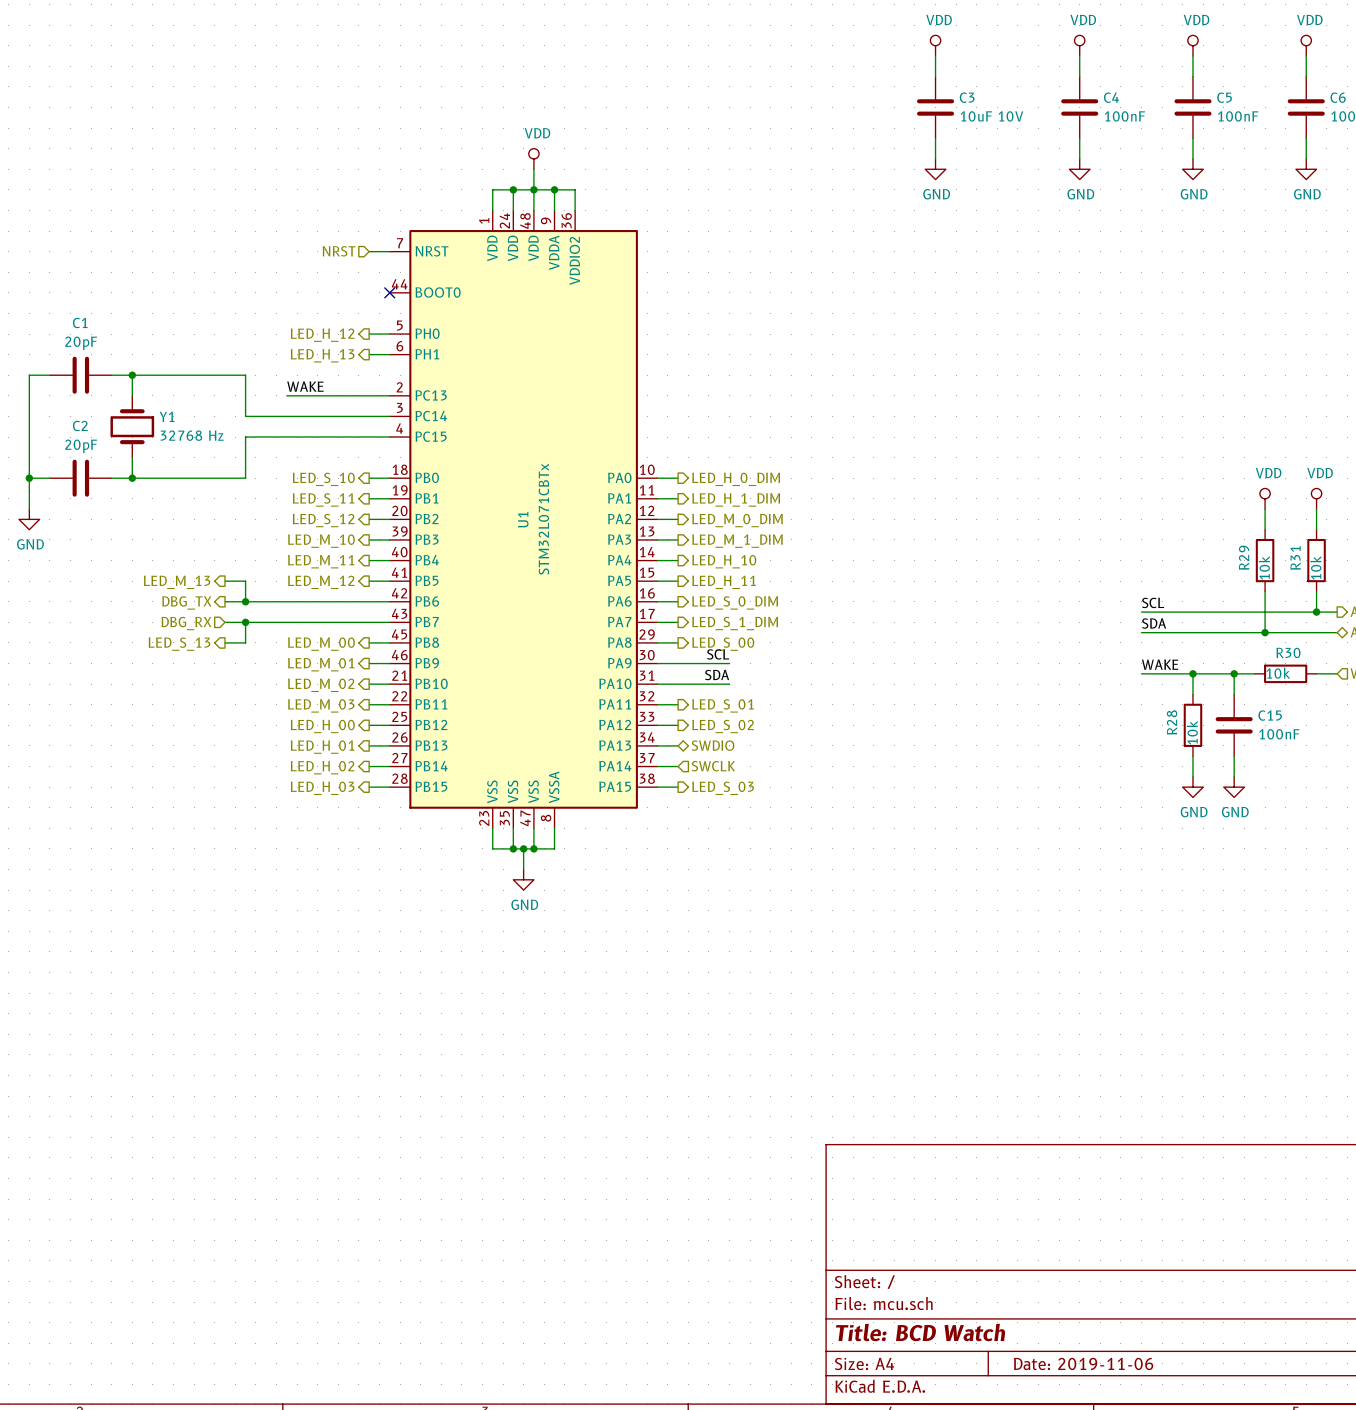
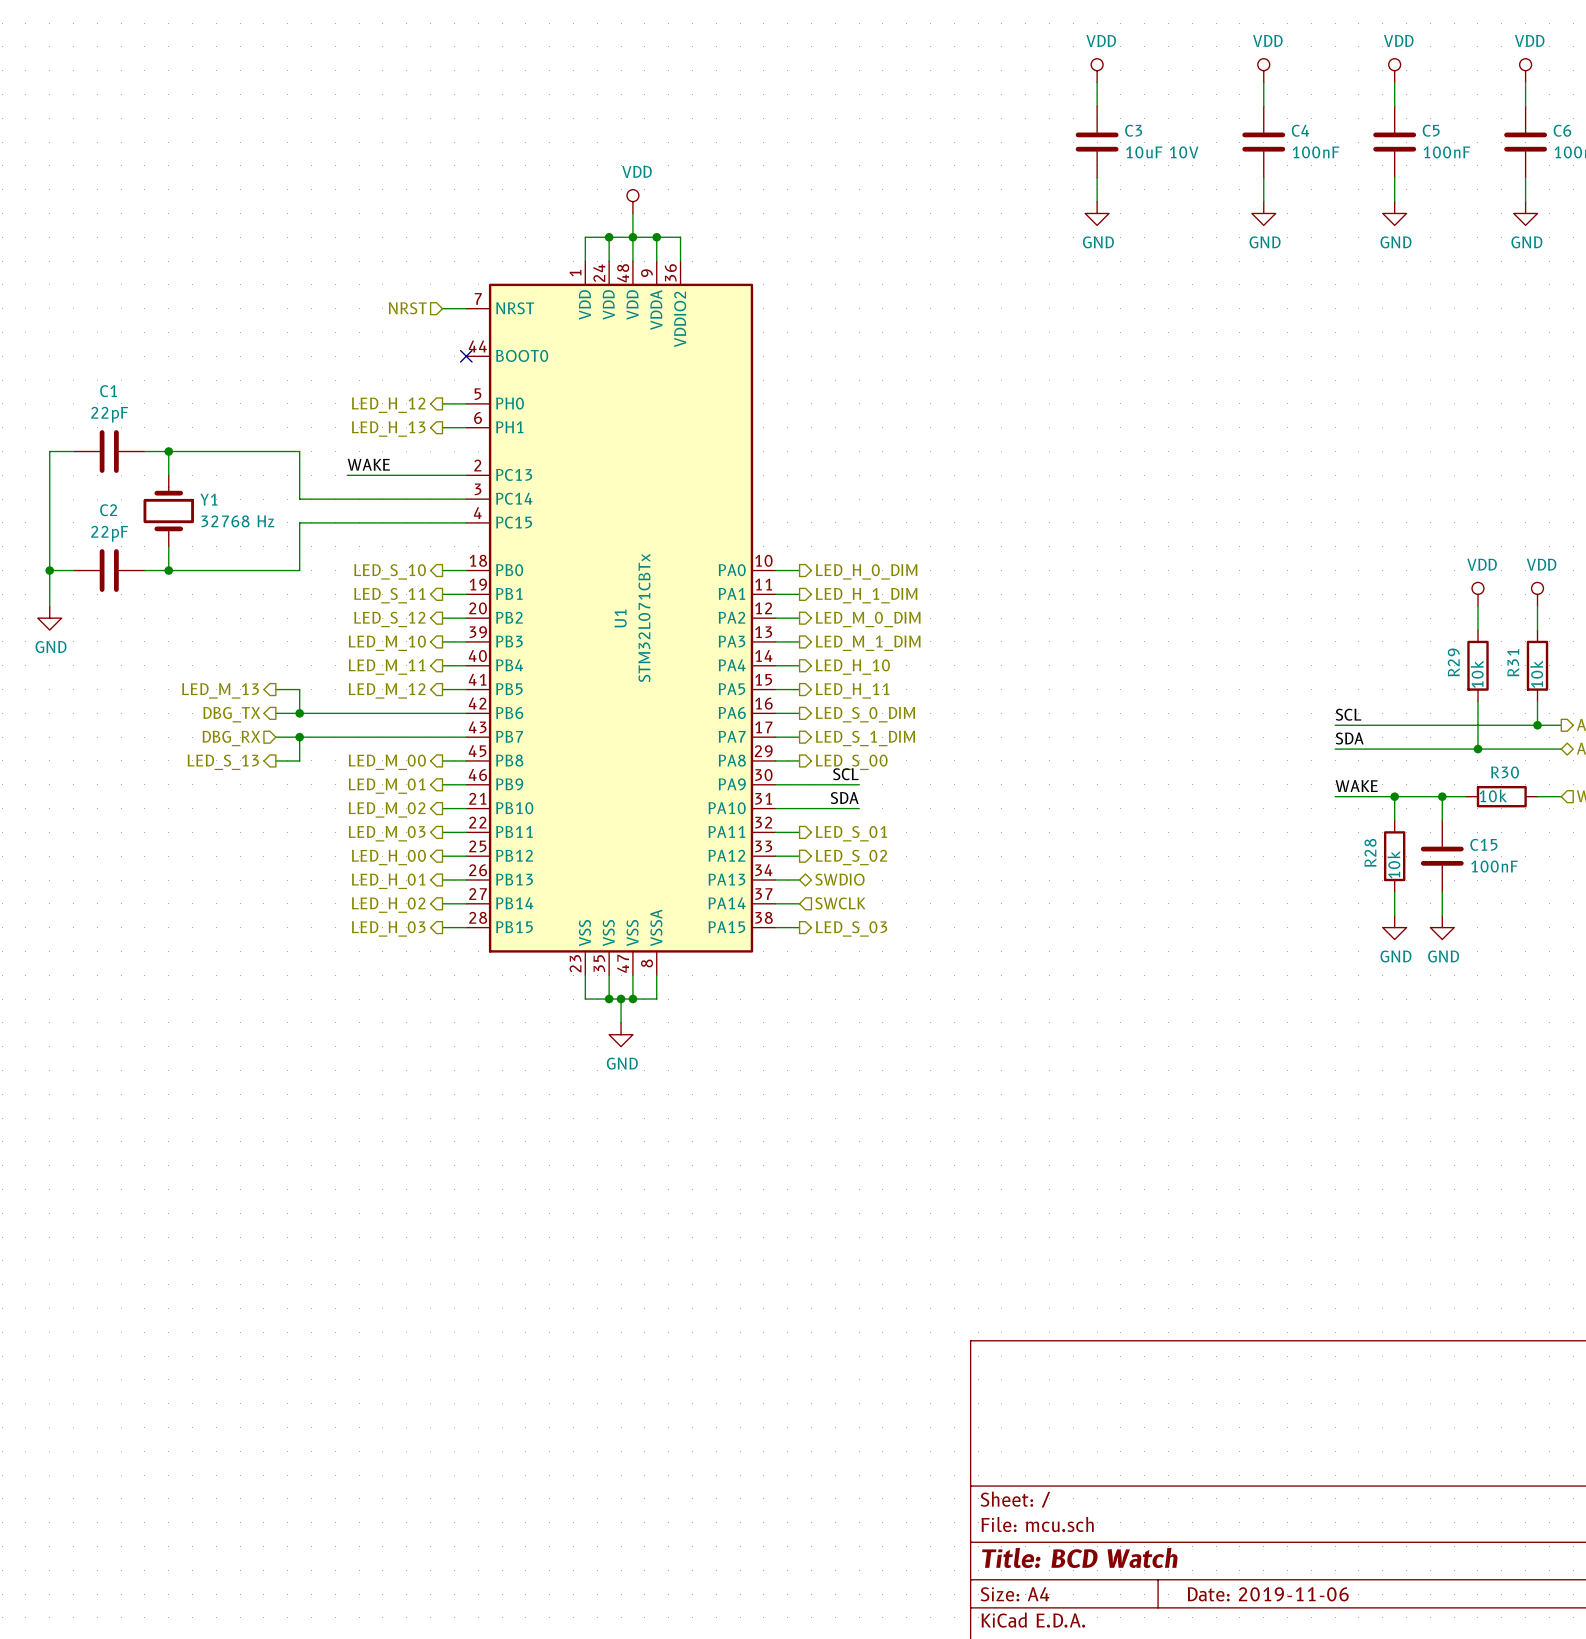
C1 value: 20pF (81, 343) -> 22pF (109, 414)
C2 value: 20pF (81, 446) -> 22pF (109, 533)

